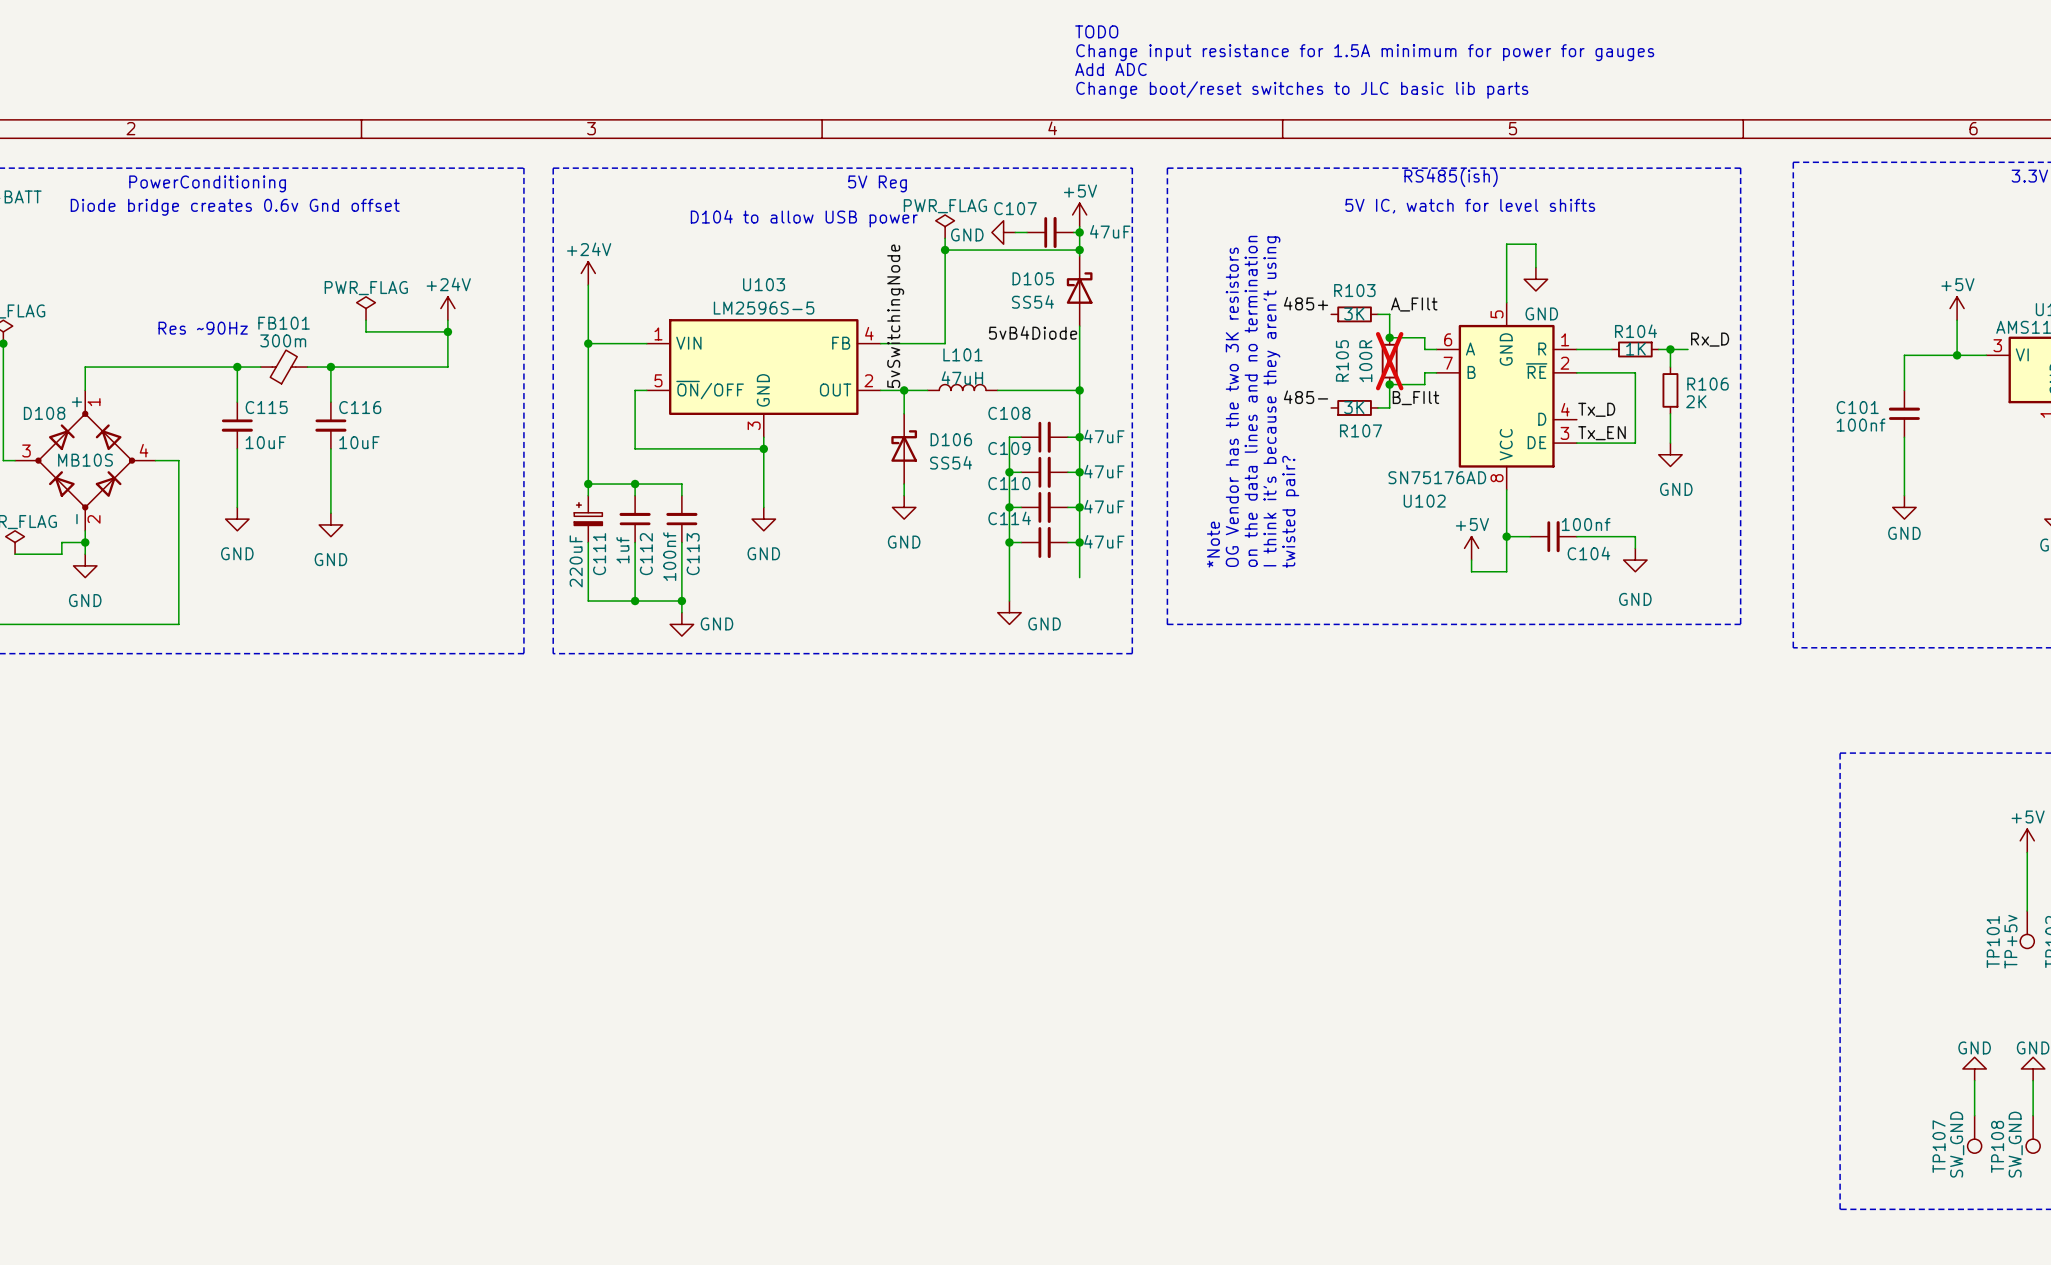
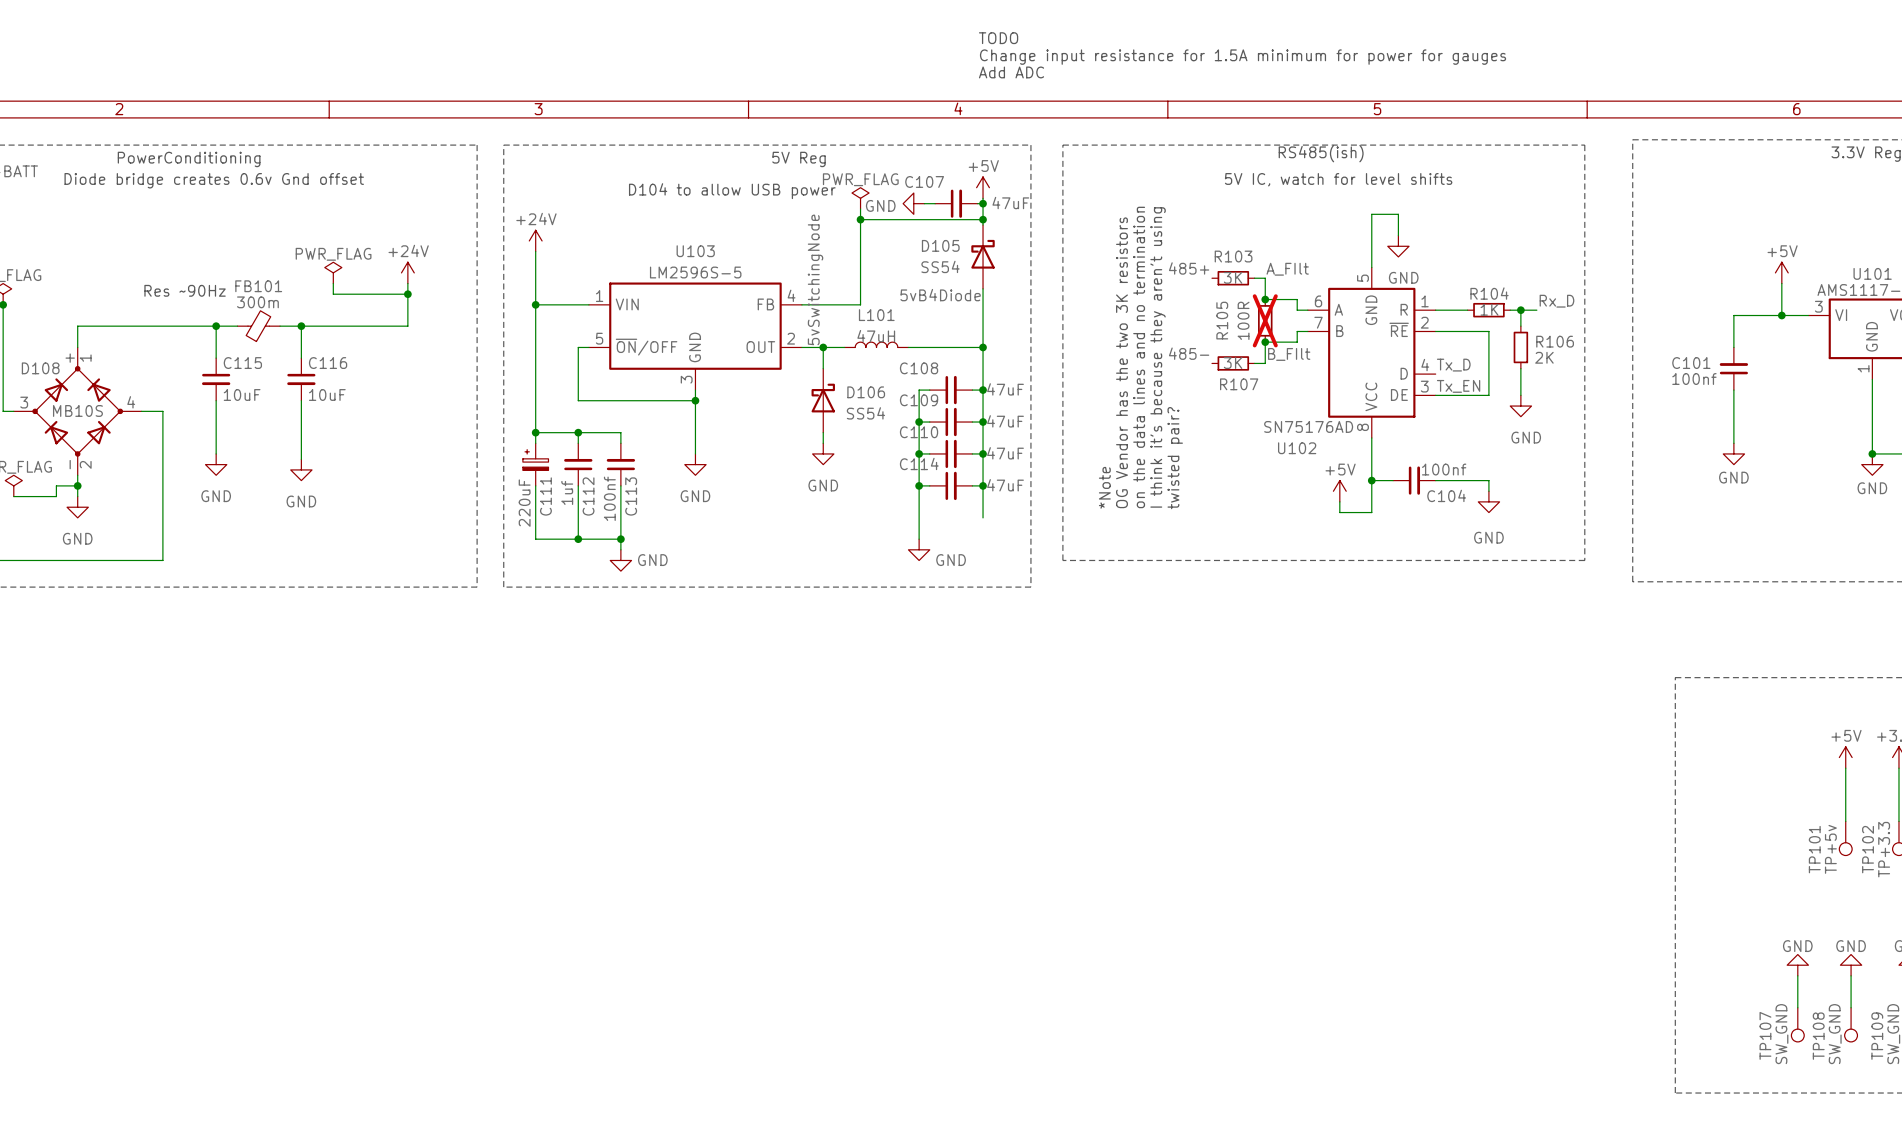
text: TODO (1096, 31) -> none
text: Change input resistance for 1.5A minimum for power for gauges (1365, 52) -> TODO (998, 38)
text: Add ADC (1110, 69) -> Change input resistance for 1.5A minimum for power for gauges (1243, 57)
text: Change boot/reset switches to JLC basic lib parts (1302, 90) -> Add ADC (1011, 72)

